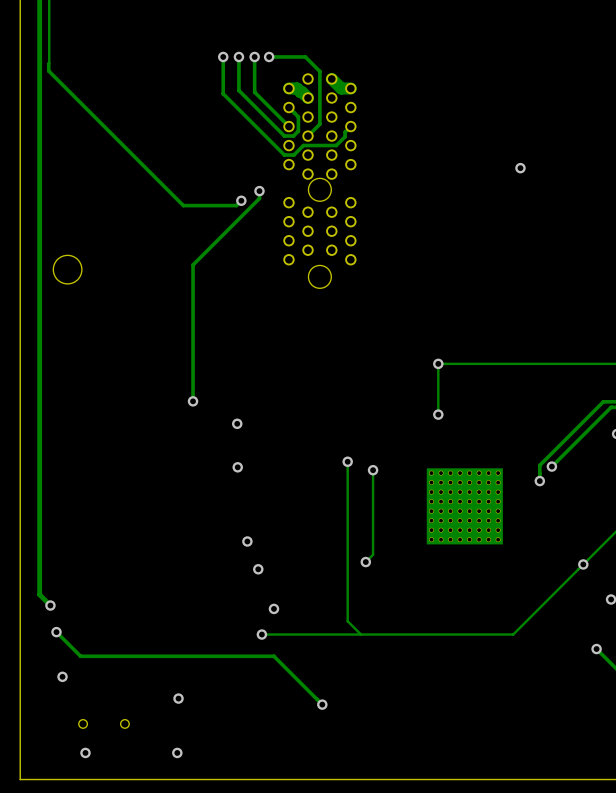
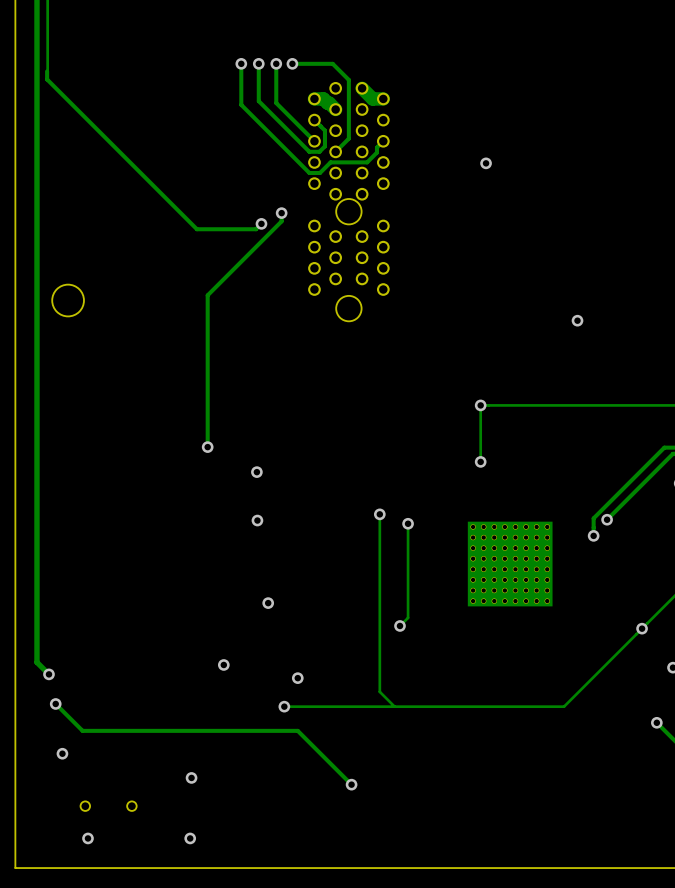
via: none -> (486, 163)
via: (520, 168) -> none
via: none -> (577, 320)
via: (258, 569) -> none
via: none -> (223, 664)

